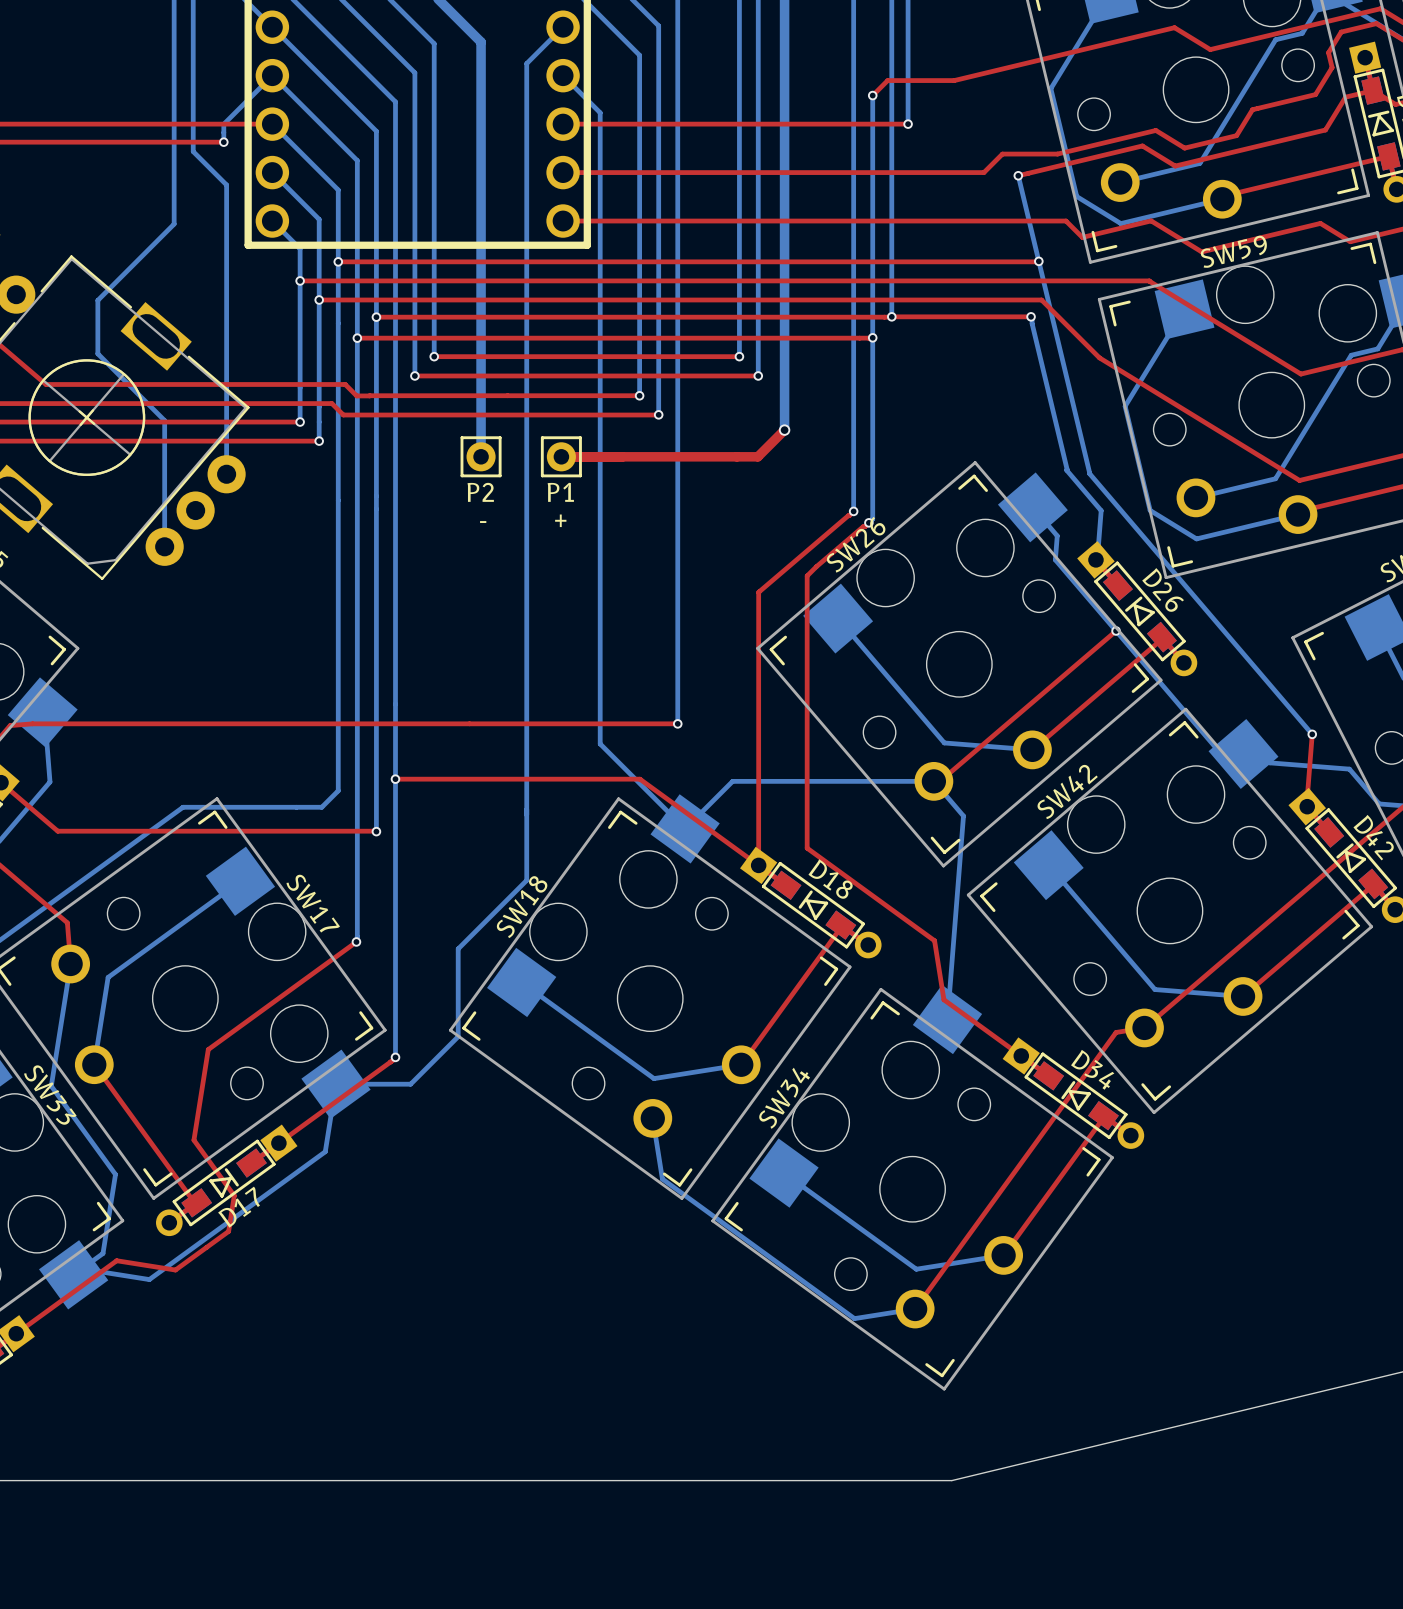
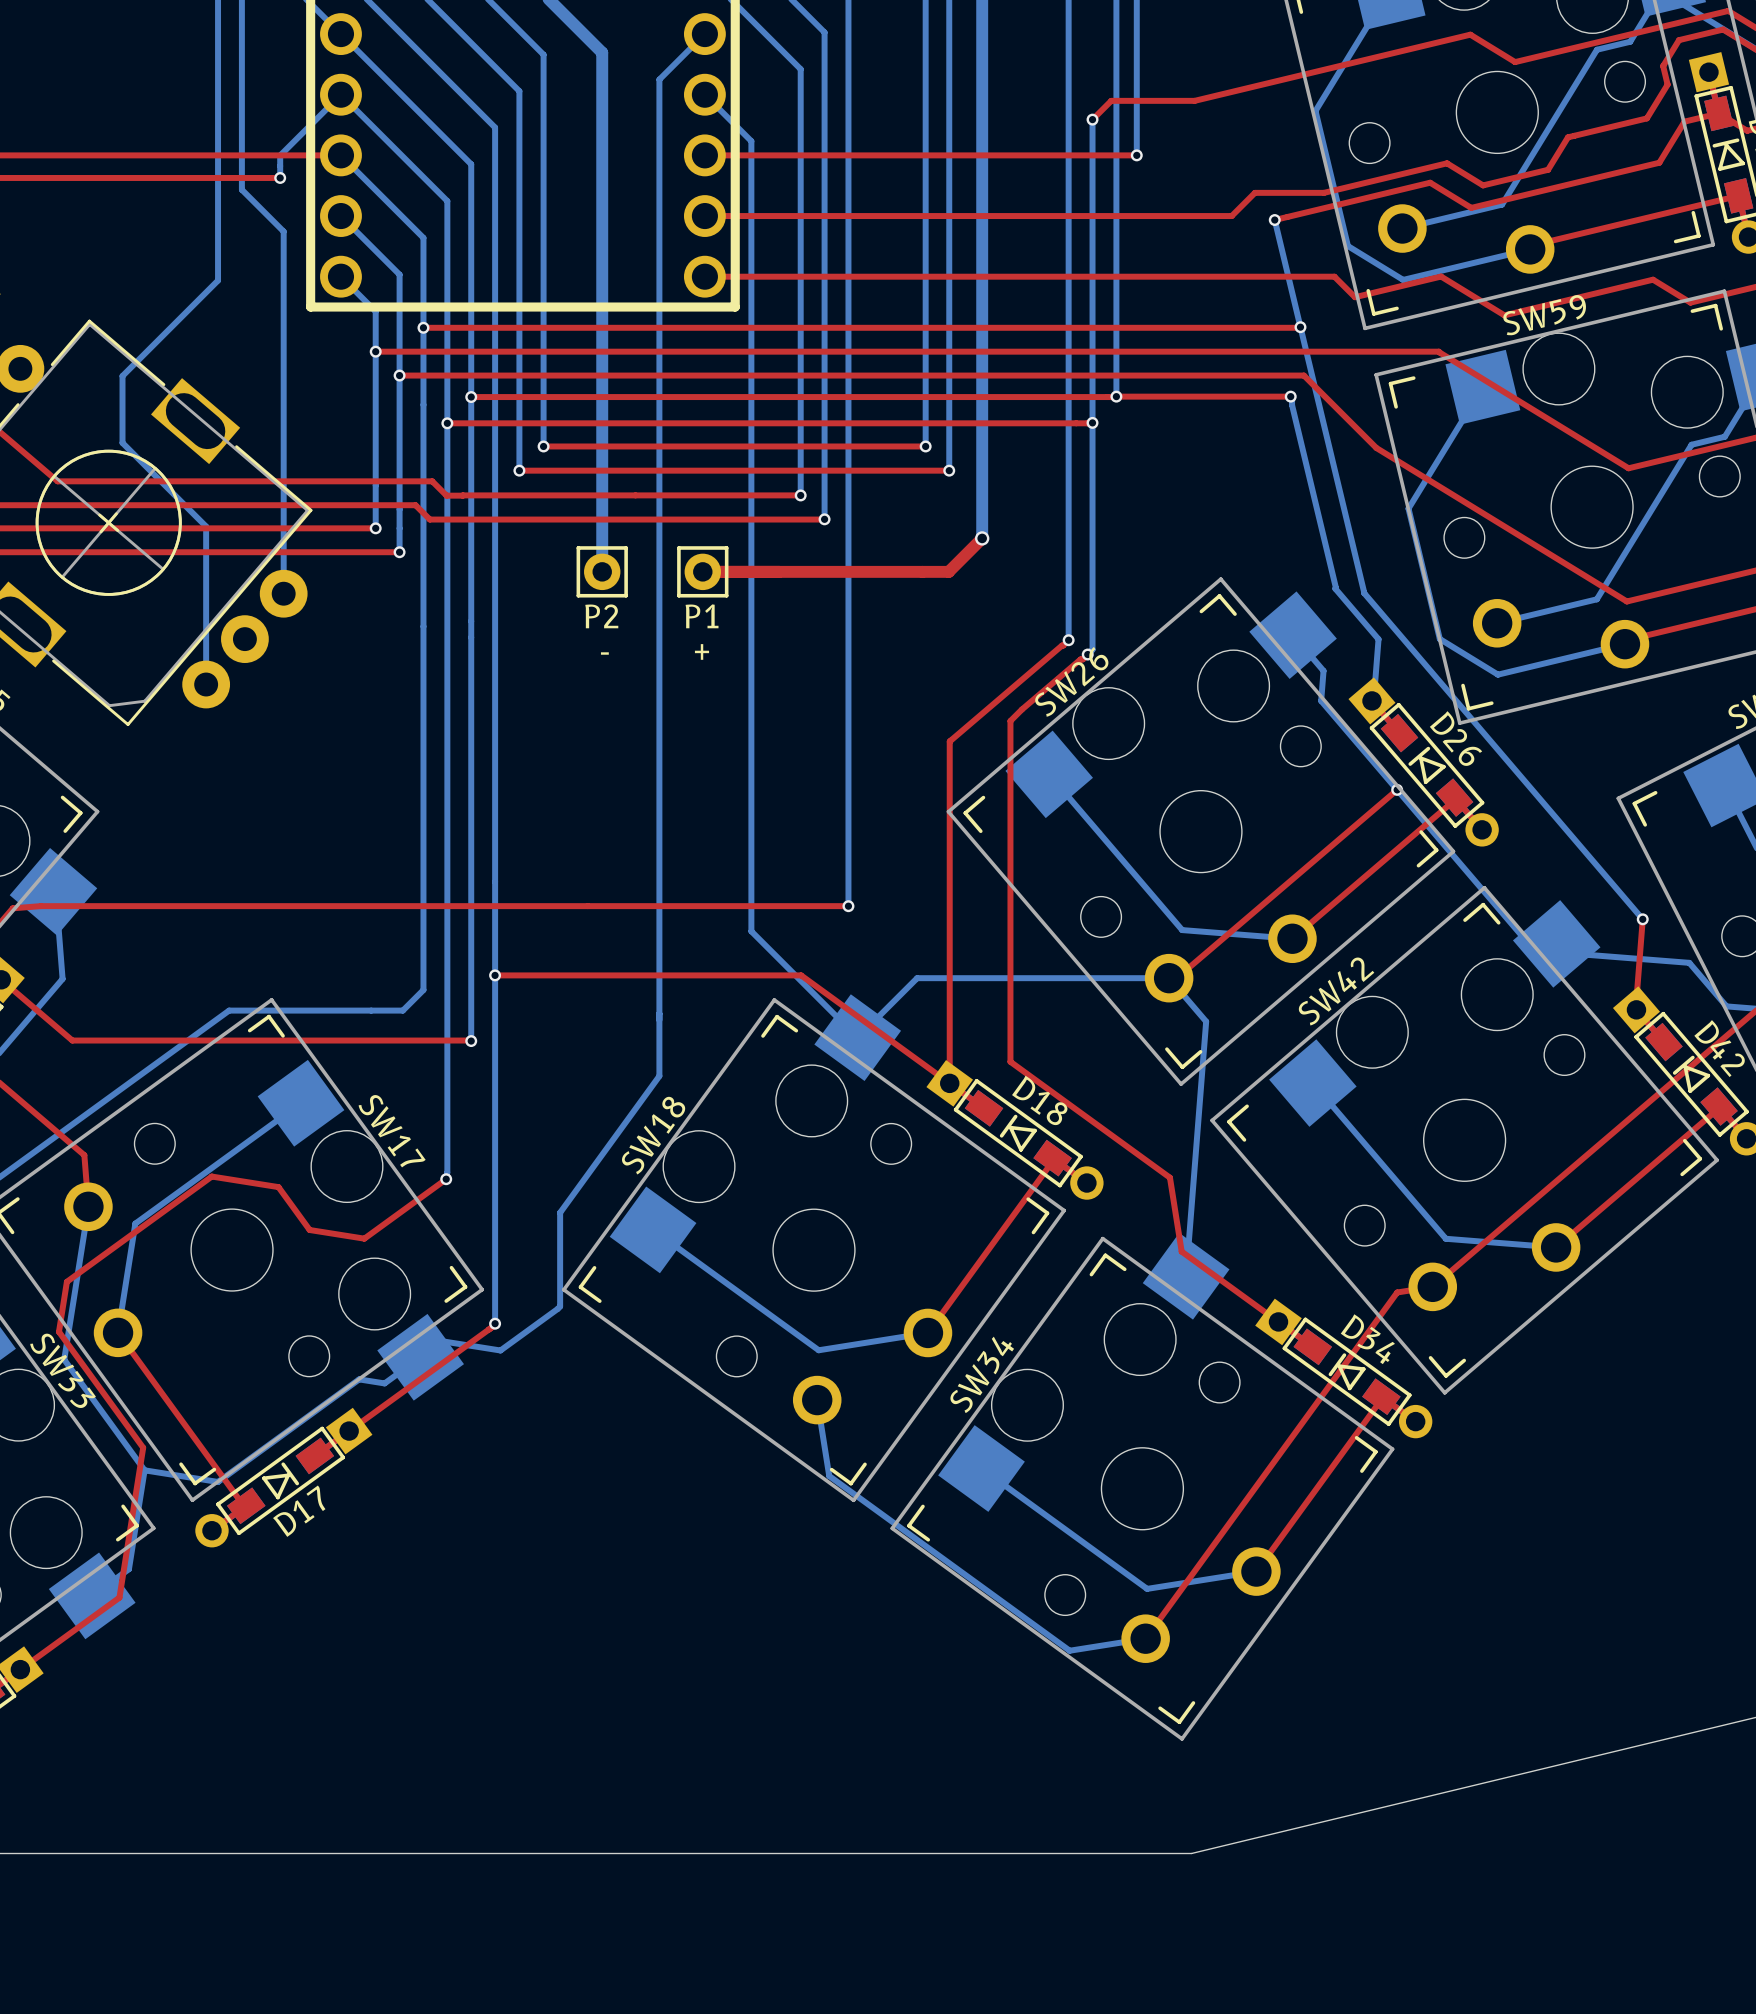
bottom track: (526, 859) (526, 880) (458, 948) (458, 1036) (410, 1084) (336, 1084) (325, 1151) (149, 1279) (81, 1268) -> (659, 1076) (560, 1212) (560, 1306) (557, 1308) (500, 1350) (442, 1341) (384, 1383) (359, 1379) (218, 1481) (144, 1470)
top track: (291, 989) (208, 1049) (193, 1140) (234, 1195) (228, 1231) (175, 1270) (116, 1260) (95, 1276) -> (364, 1238) (309, 1229) (278, 1187) (211, 1176) (66, 1281) (58, 1331) (143, 1447) (119, 1597)

